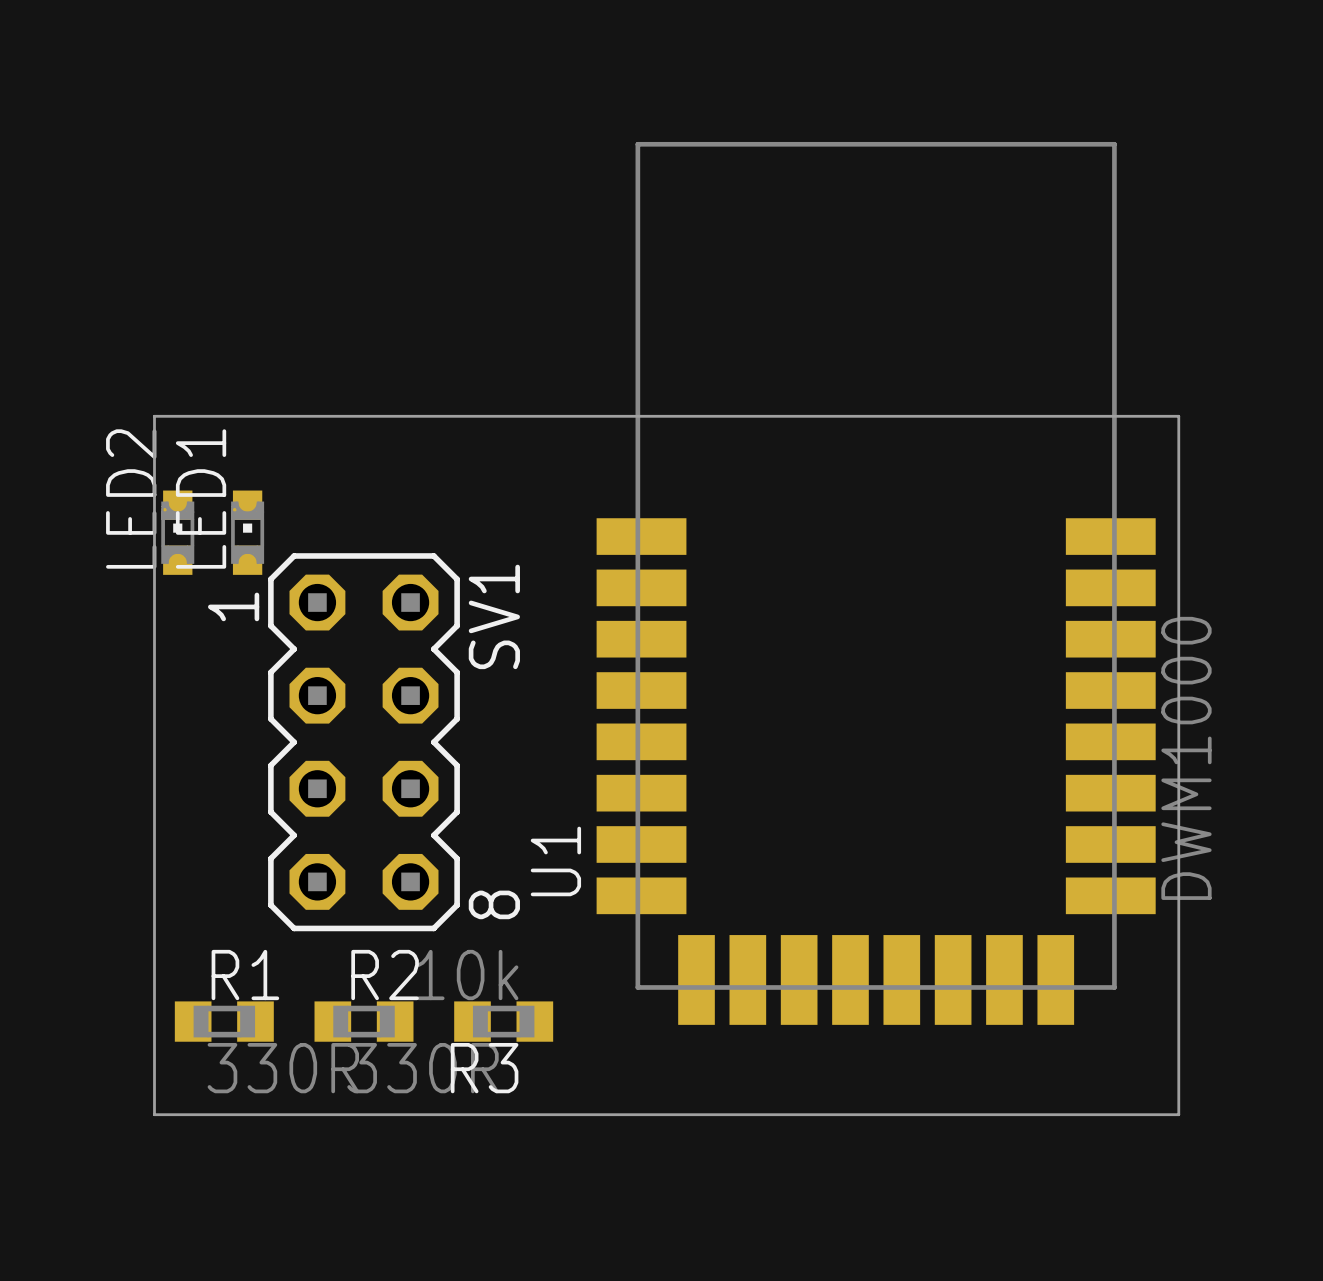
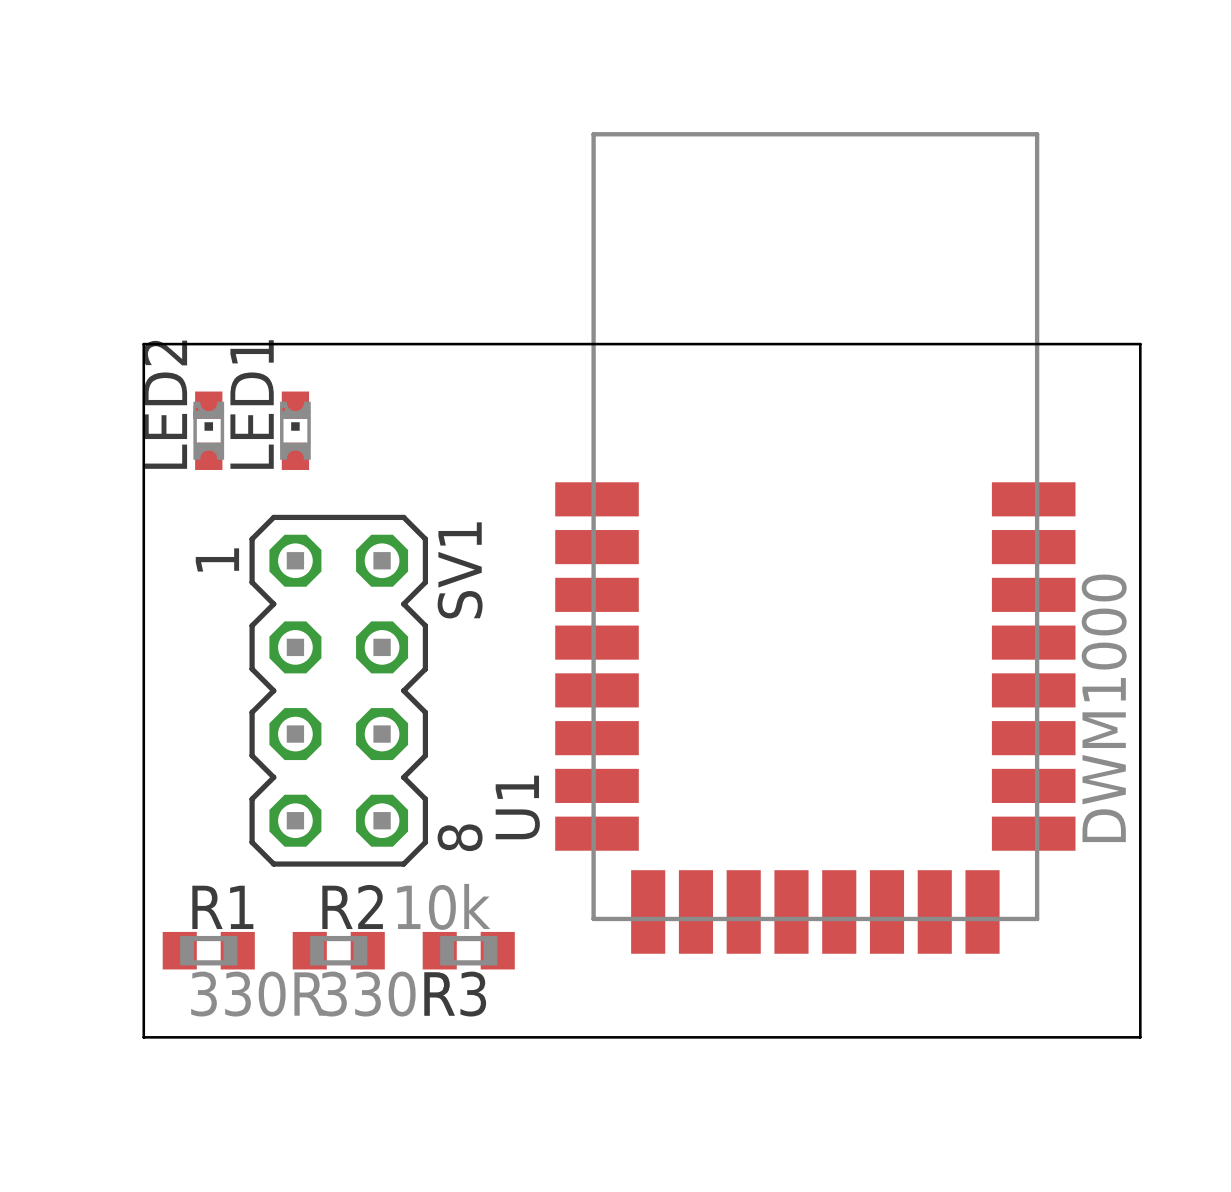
board edge: (154, 416) (1178, 416) (1178, 1114) -> (143, 387) (143, 344) (1140, 344) (1140, 1037) (1096, 1037)
LED2 position: (177, 532) -> (208, 430)
LED1 position: (247, 532) -> (295, 430)

